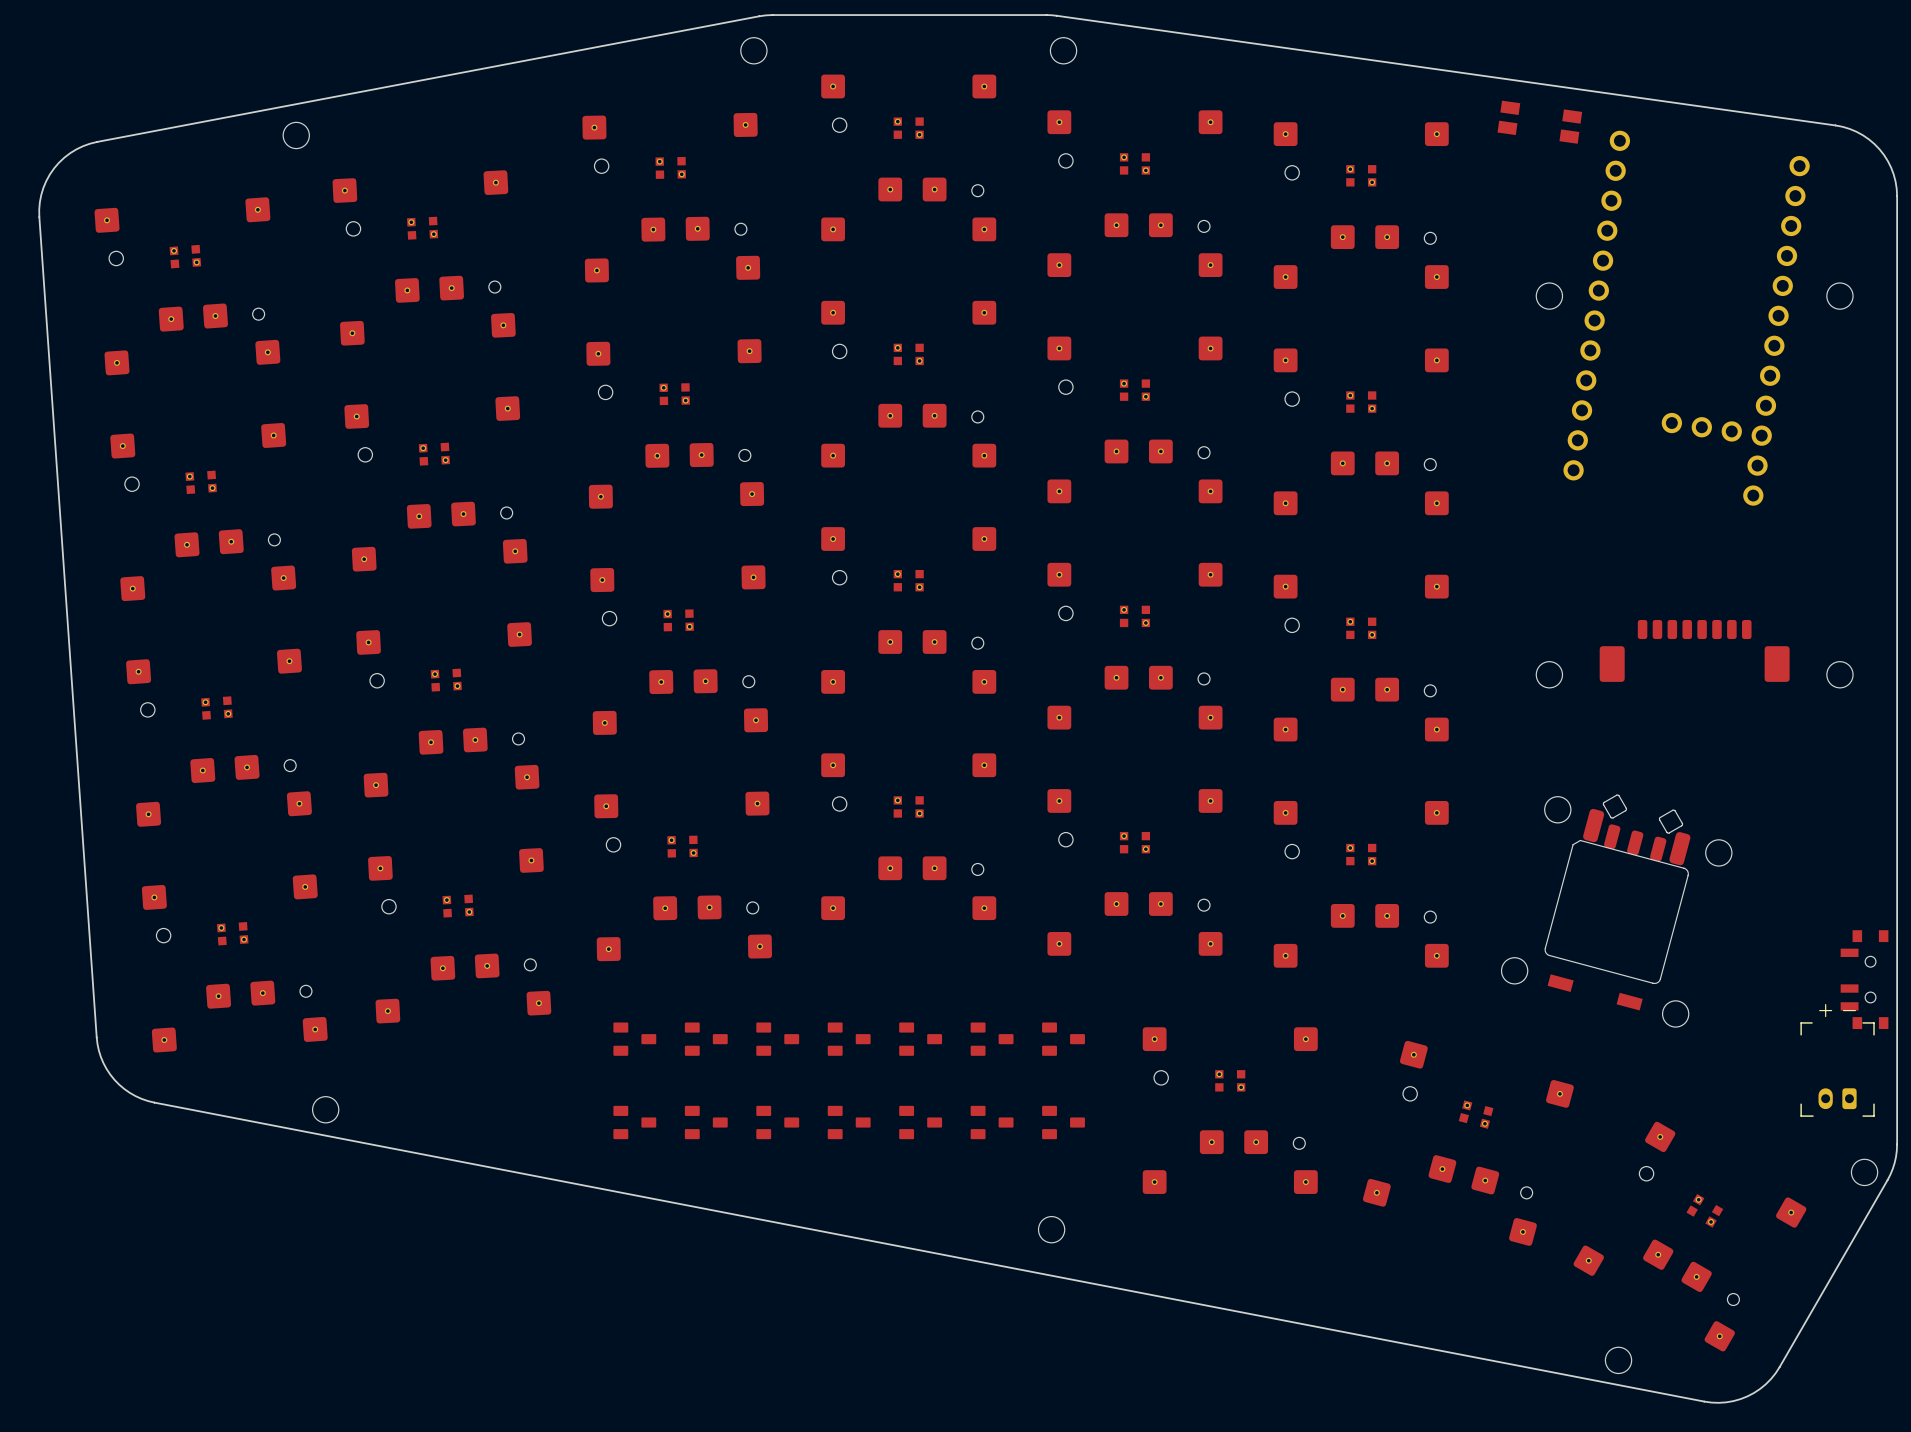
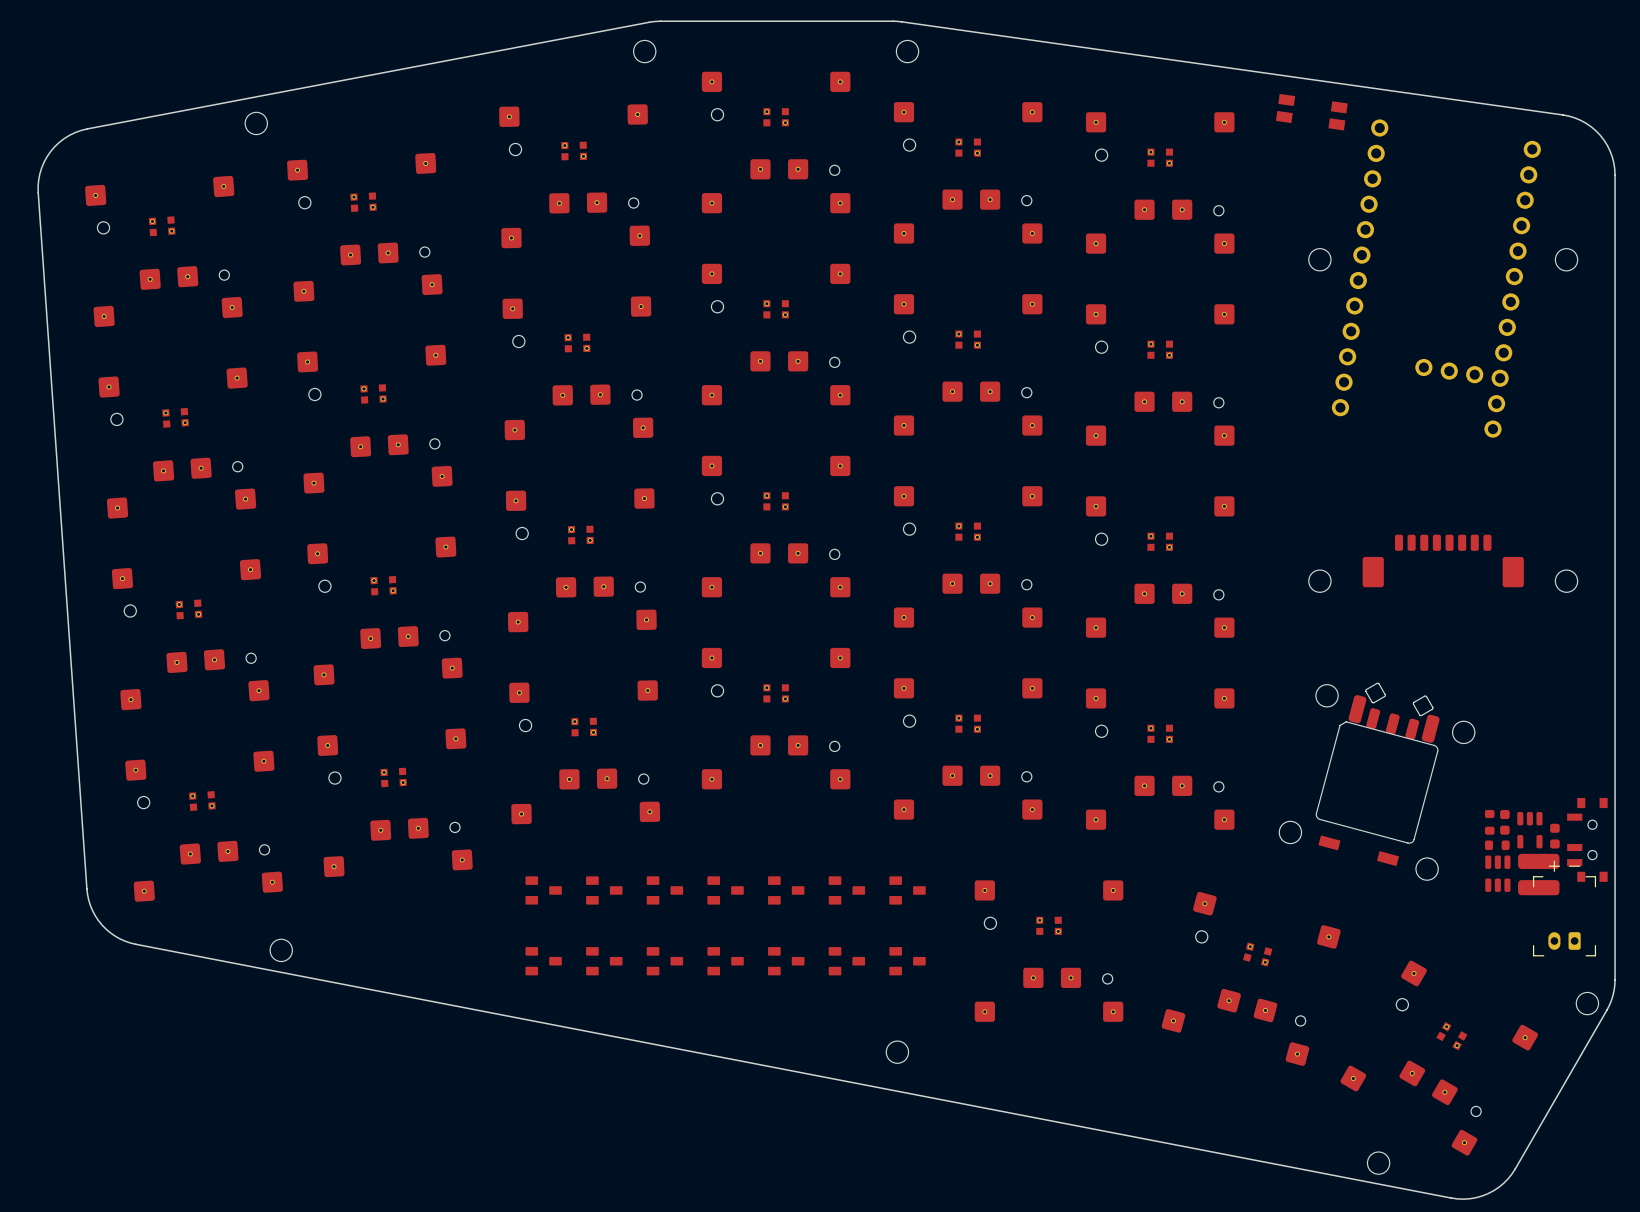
part: none -> (1489, 822)
part: none -> (1504, 822)
part: none -> (1529, 830)
part: none -> (1554, 836)
part: none -> (1497, 845)
part: none -> (1497, 873)
part: none -> (1538, 874)

